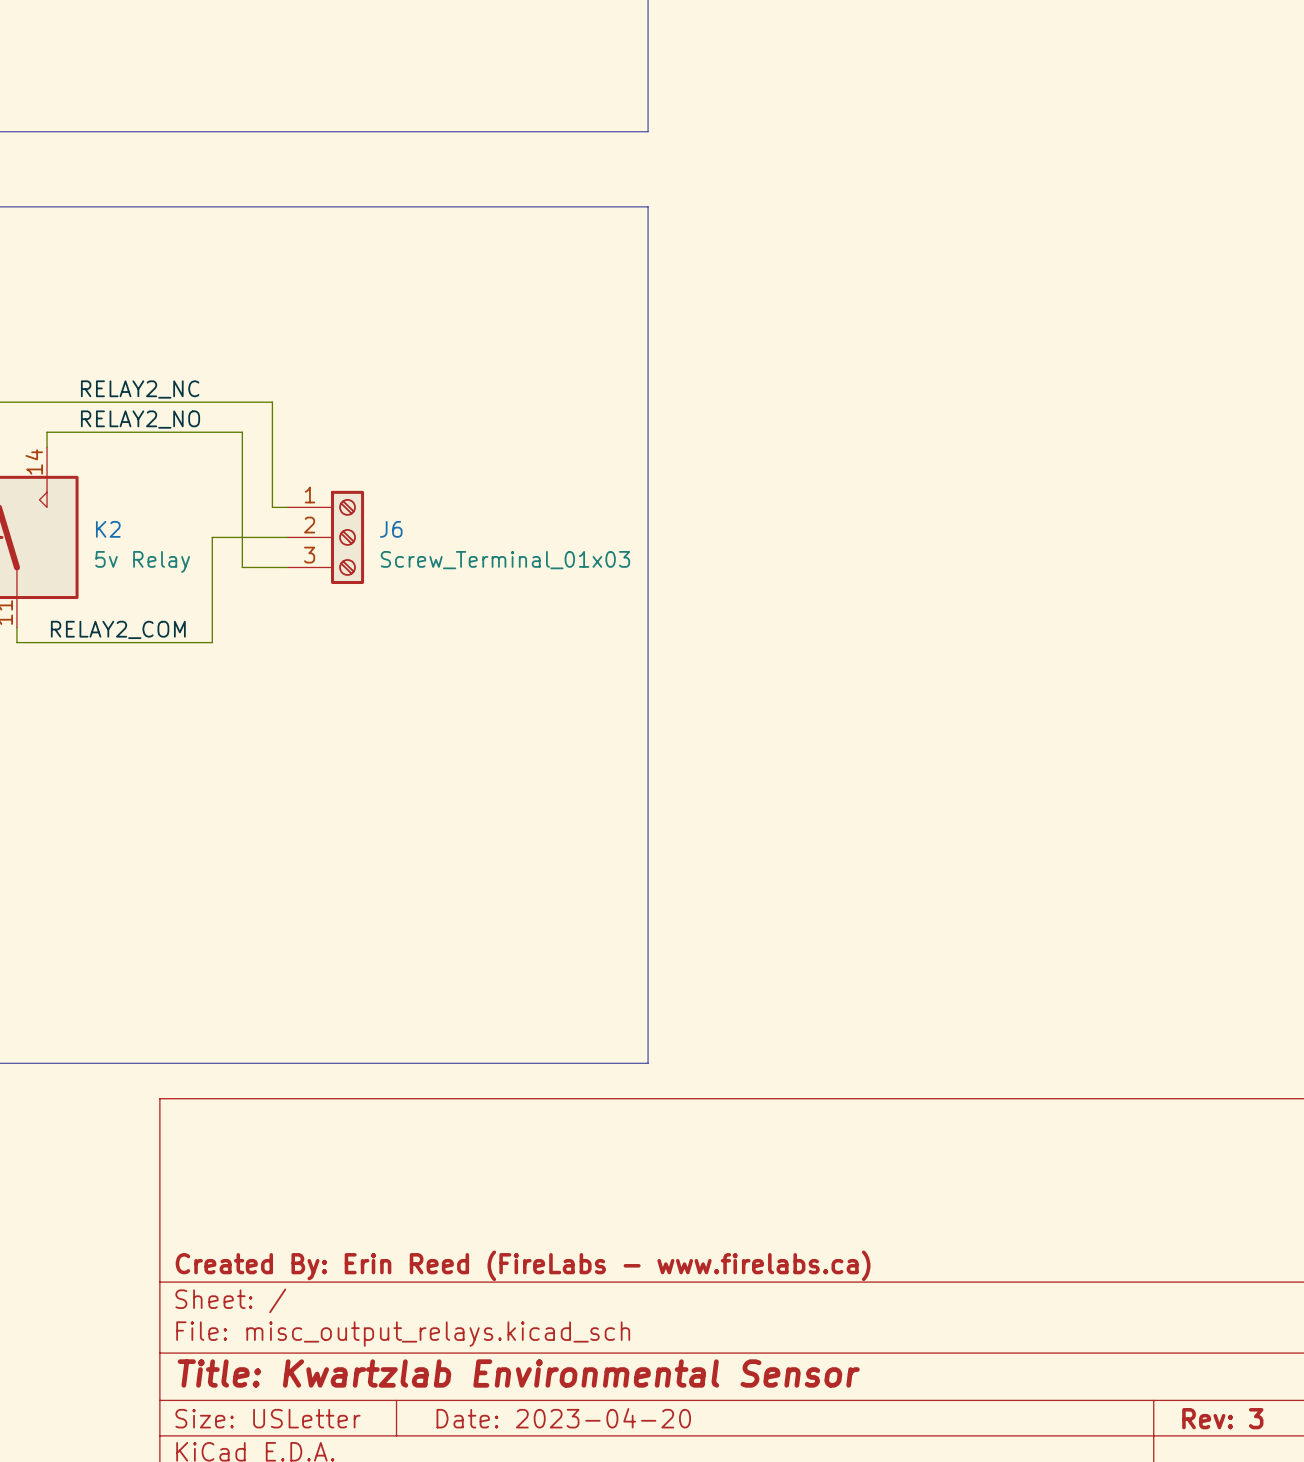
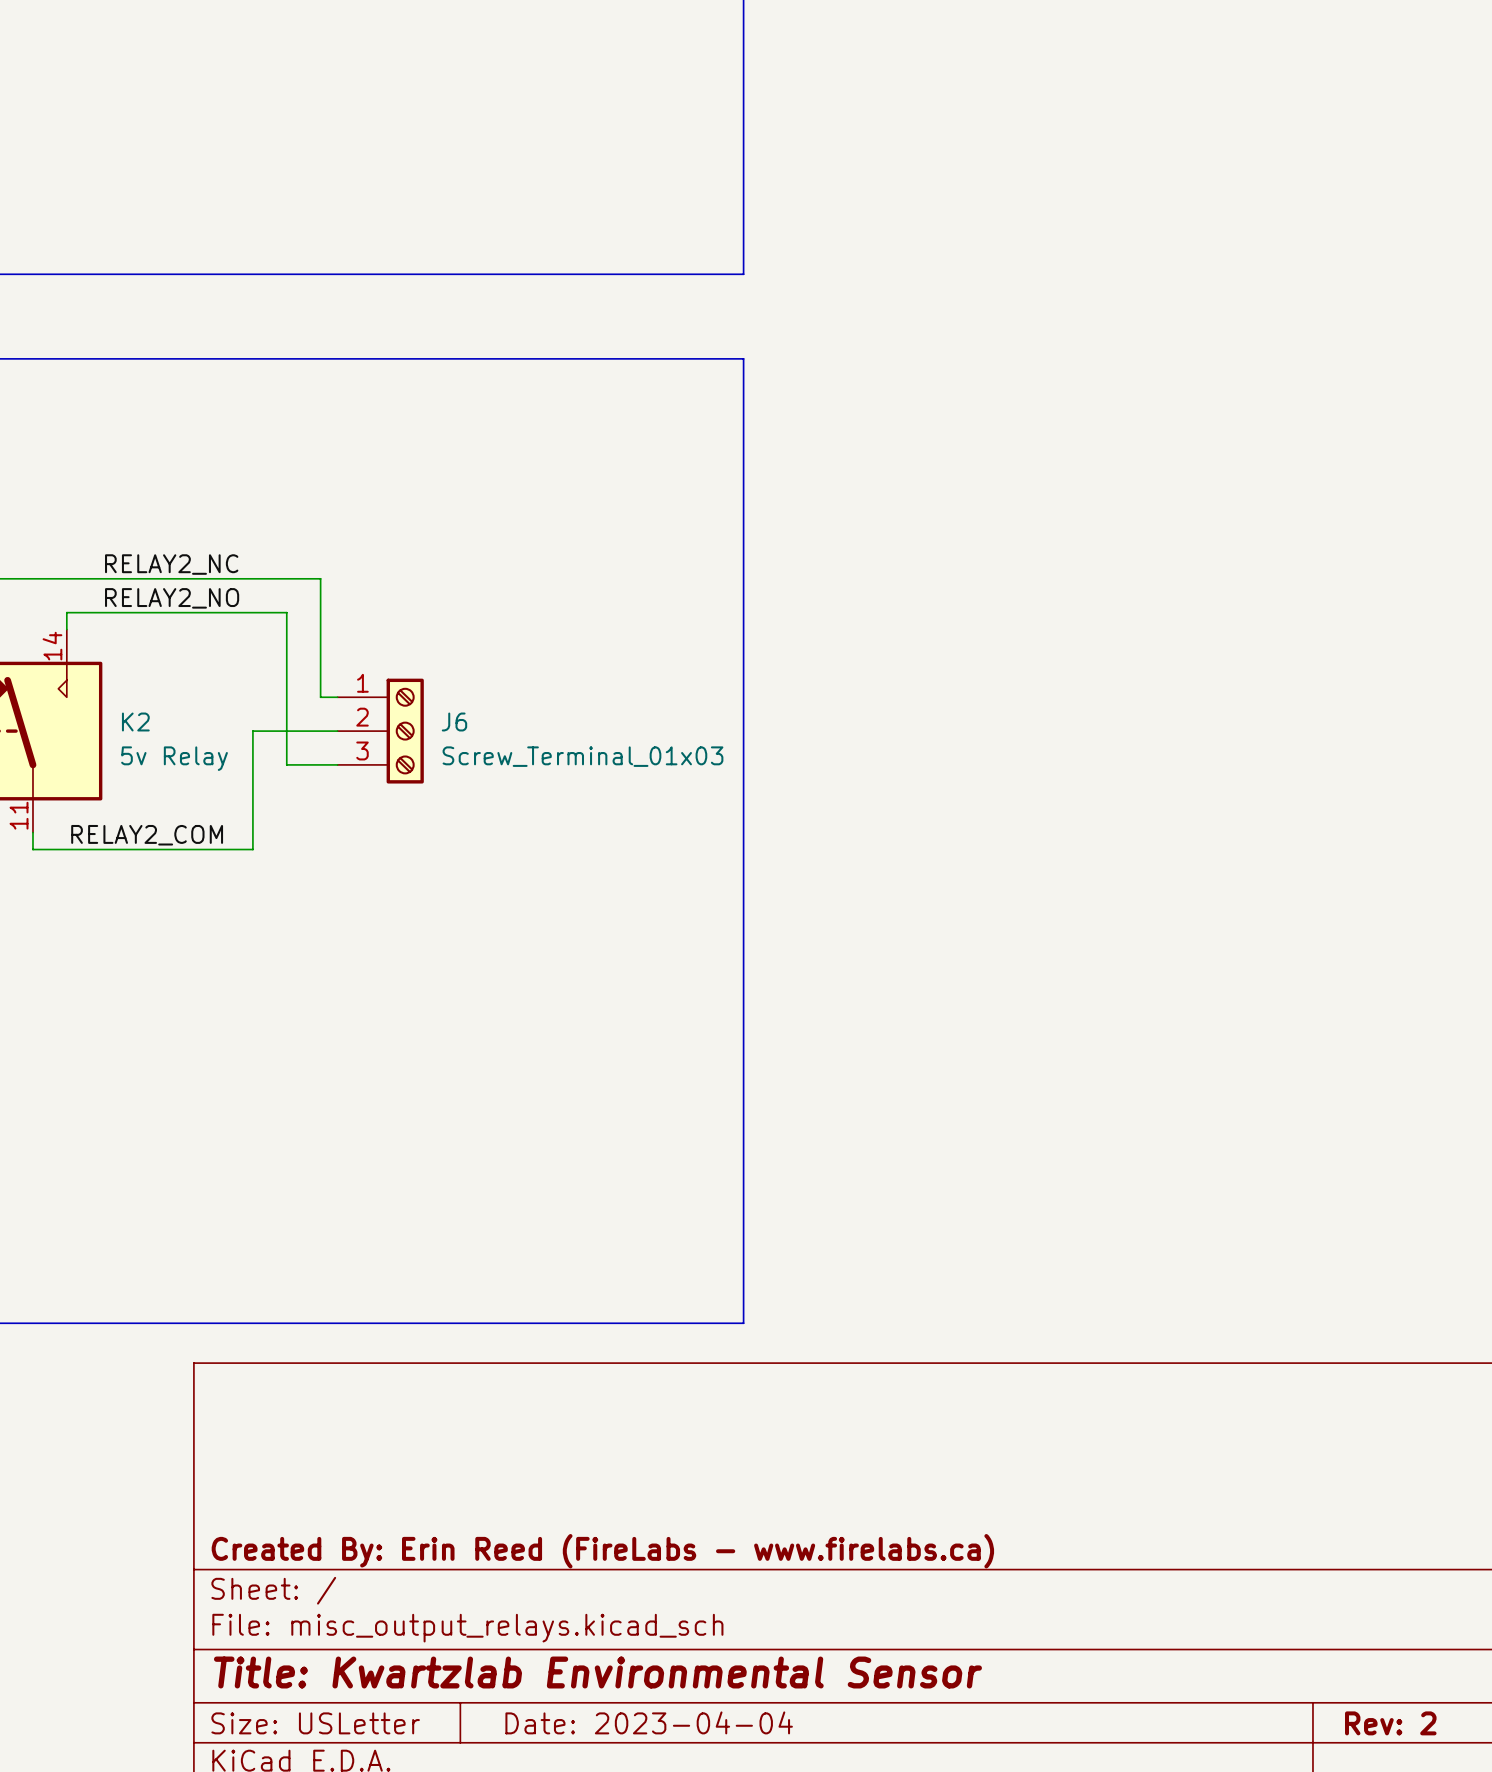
title block: Date: 2023-04-20 (563, 1418) -> Date: 2023-04-04 (649, 1722)
title block: Rev: 3 (1222, 1418) -> Rev: 2 (1390, 1723)

